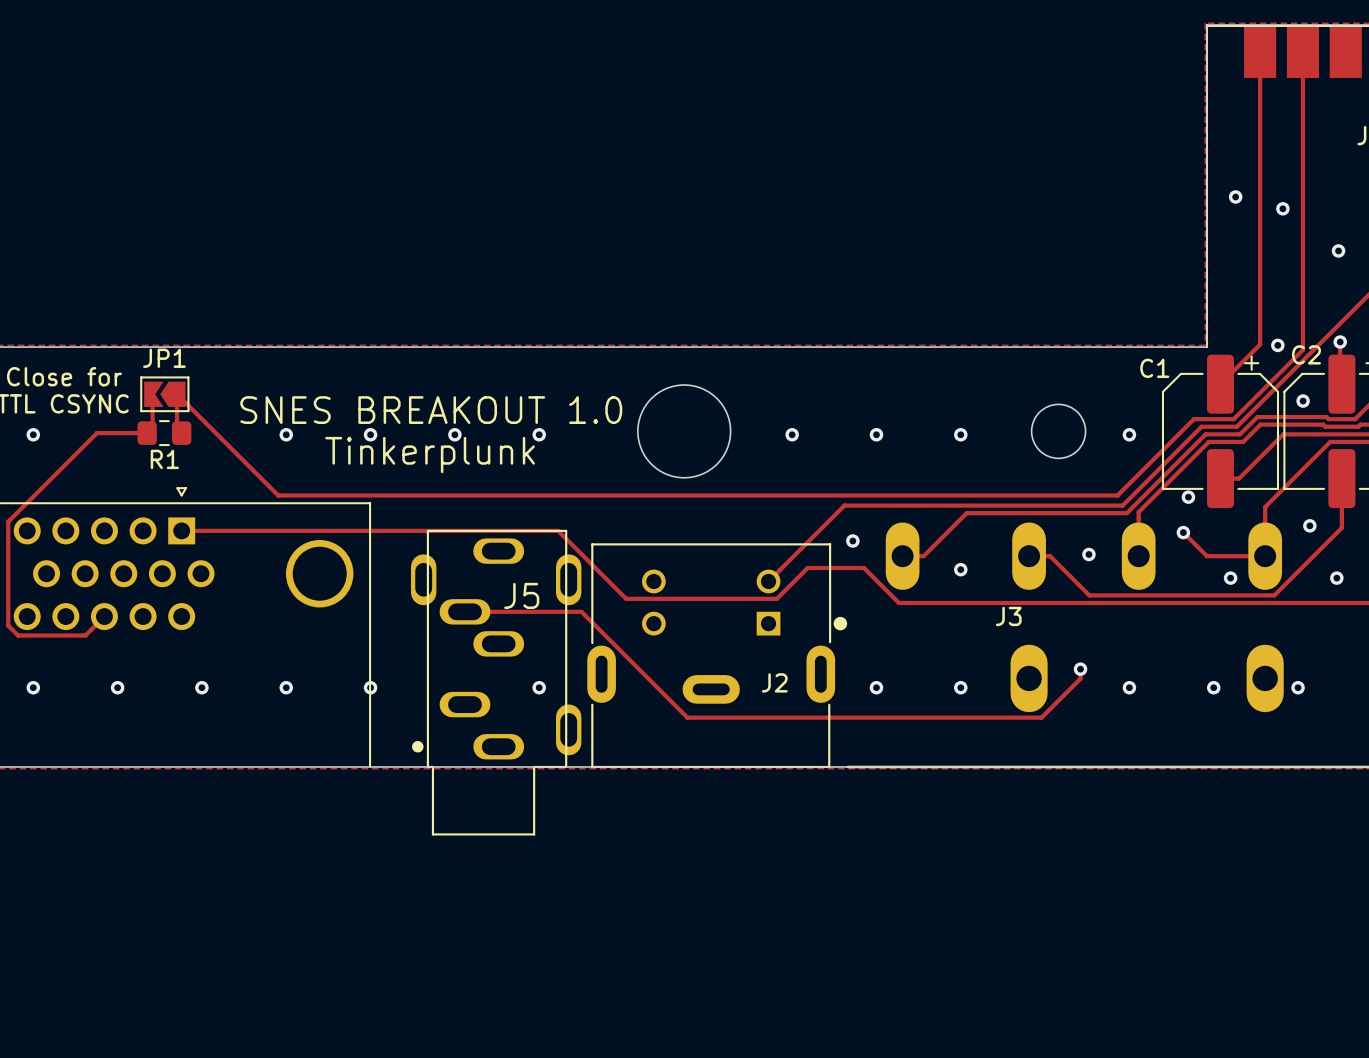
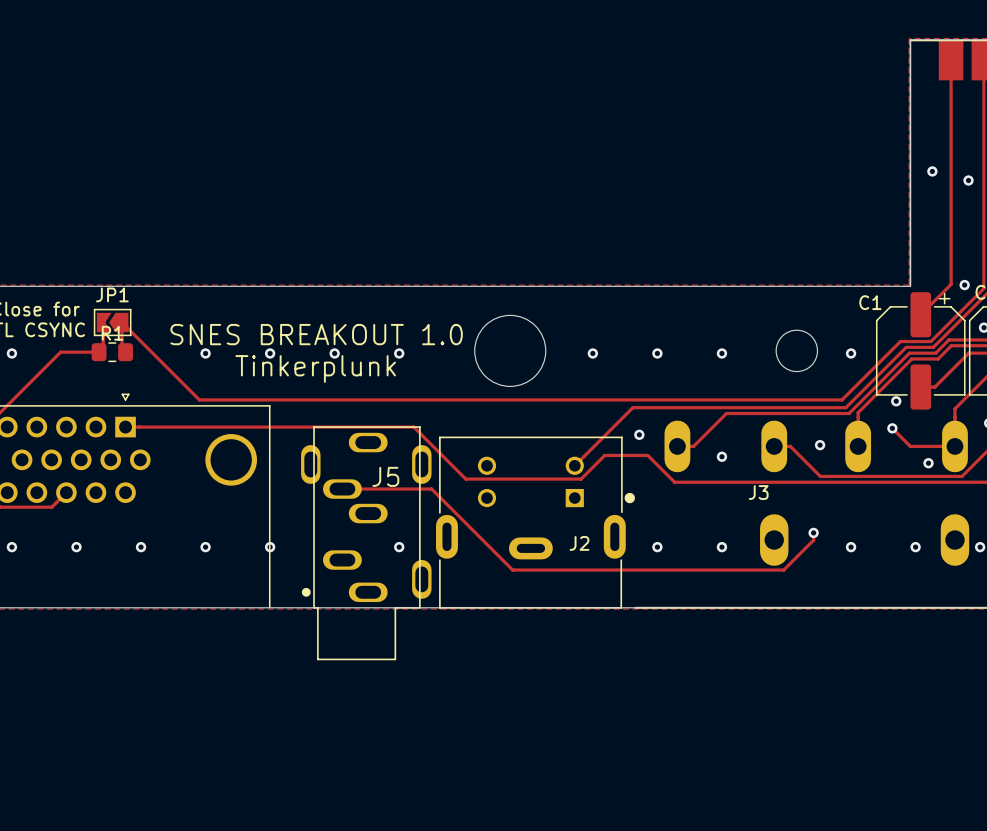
R1 name position: R1 (164, 459) -> R1 (112, 333)

